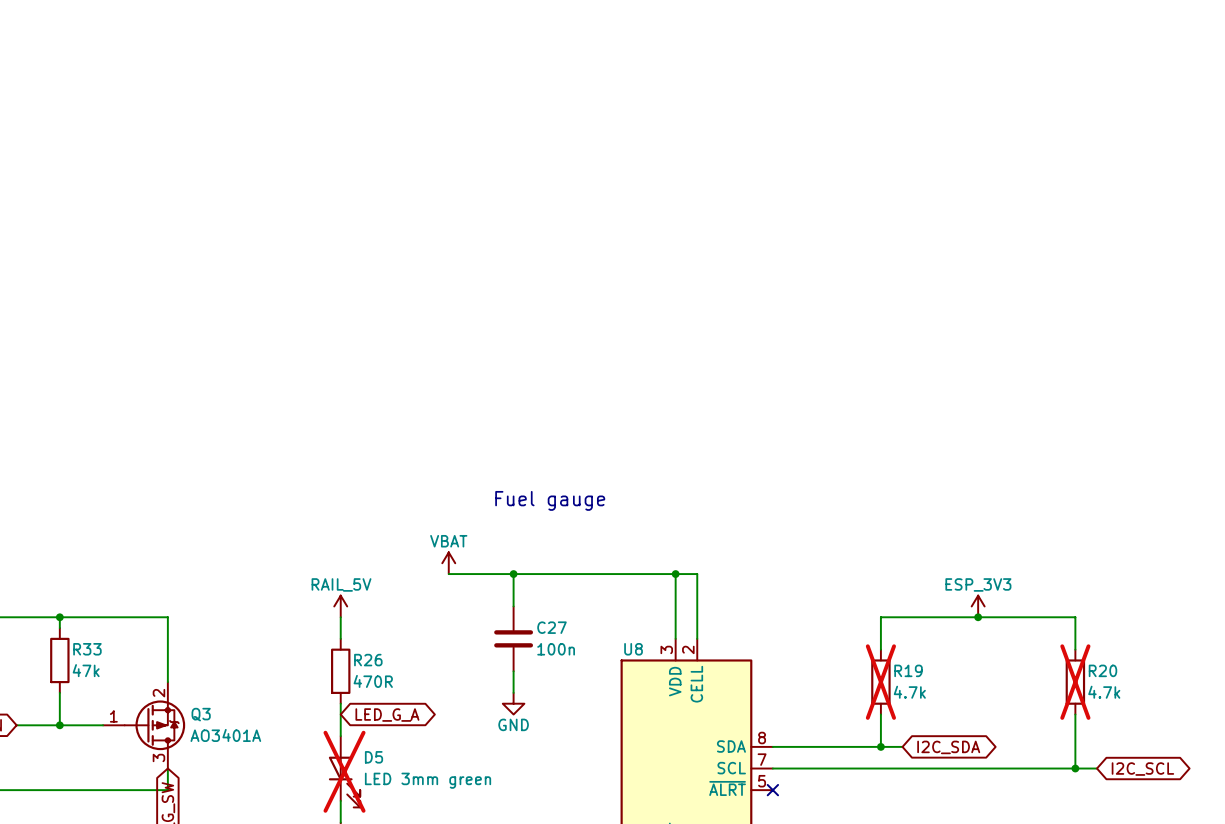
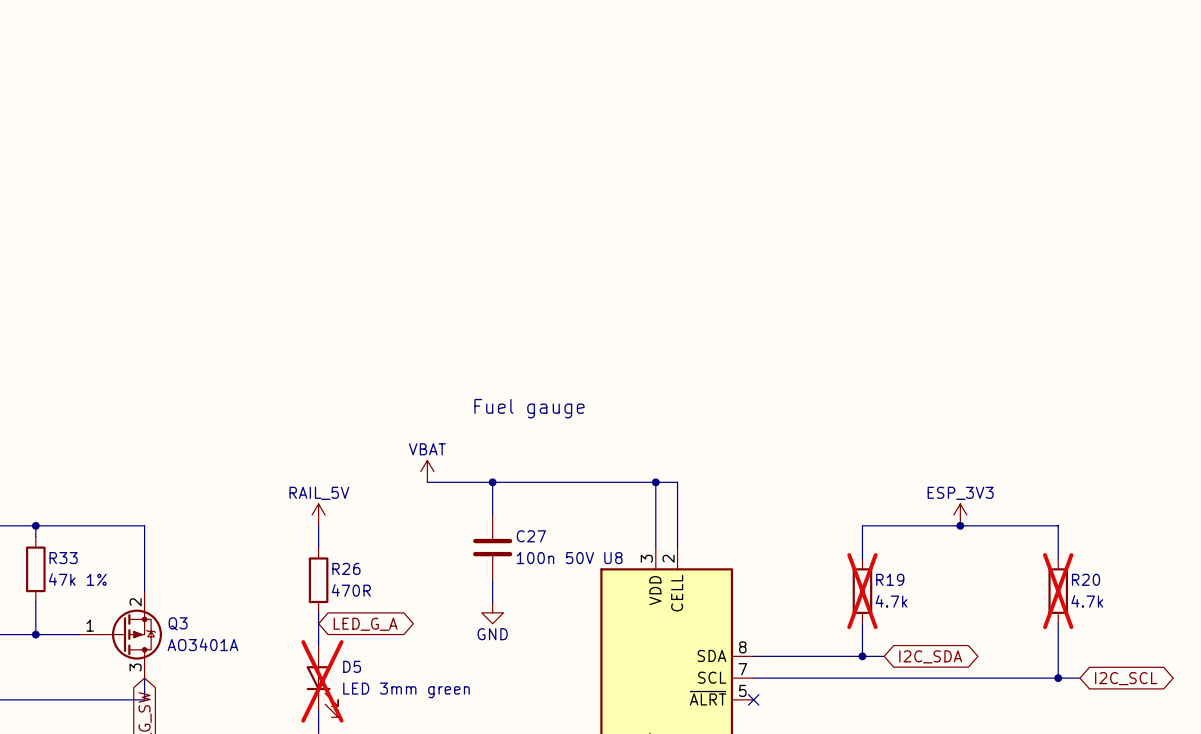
C27 value: 100n (556, 649) -> 100n 50V (555, 558)
R33 value: 47k (86, 670) -> 47k 1% (77, 579)

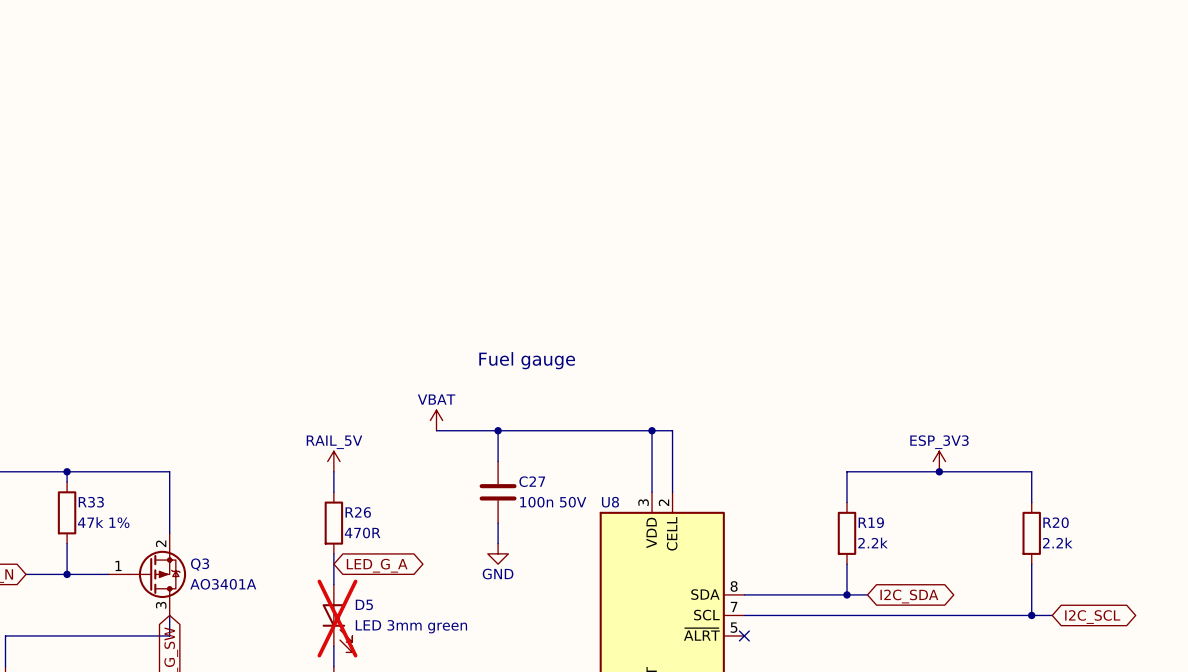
R19 do-not-place cross: (862, 591) -> none
R20 do-not-place cross: (1058, 591) -> none
R19 value: 4.7k (891, 601) -> 2.2k (873, 543)
R20 value: 4.7k (1087, 601) -> 2.2k (1057, 543)

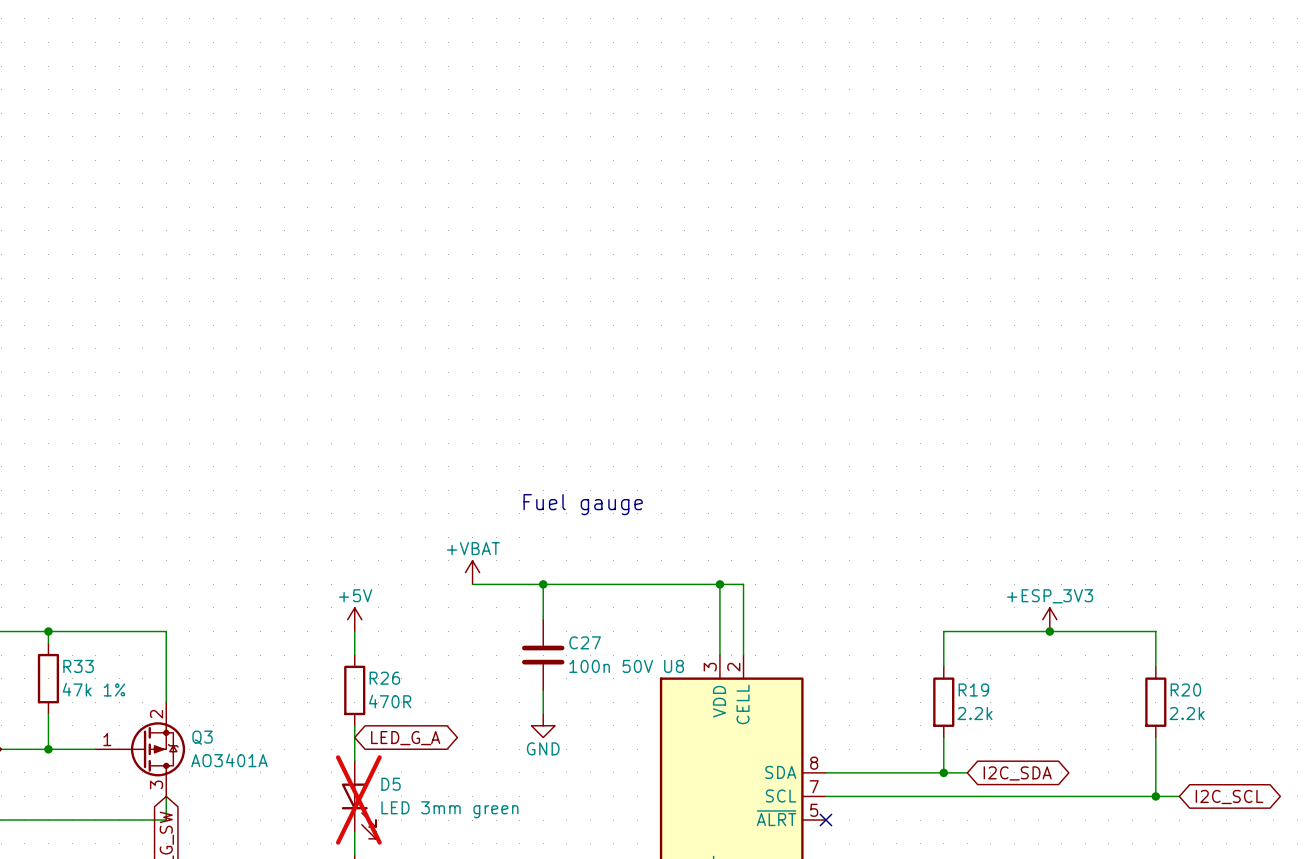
power symbol: VBAT (436, 420) -> +VBAT (472, 572)
power symbol: RAIL_5V (333, 461) -> +5V (354, 619)
power symbol: ESP_3V3 (939, 461) -> +ESP_3V3 (1049, 619)

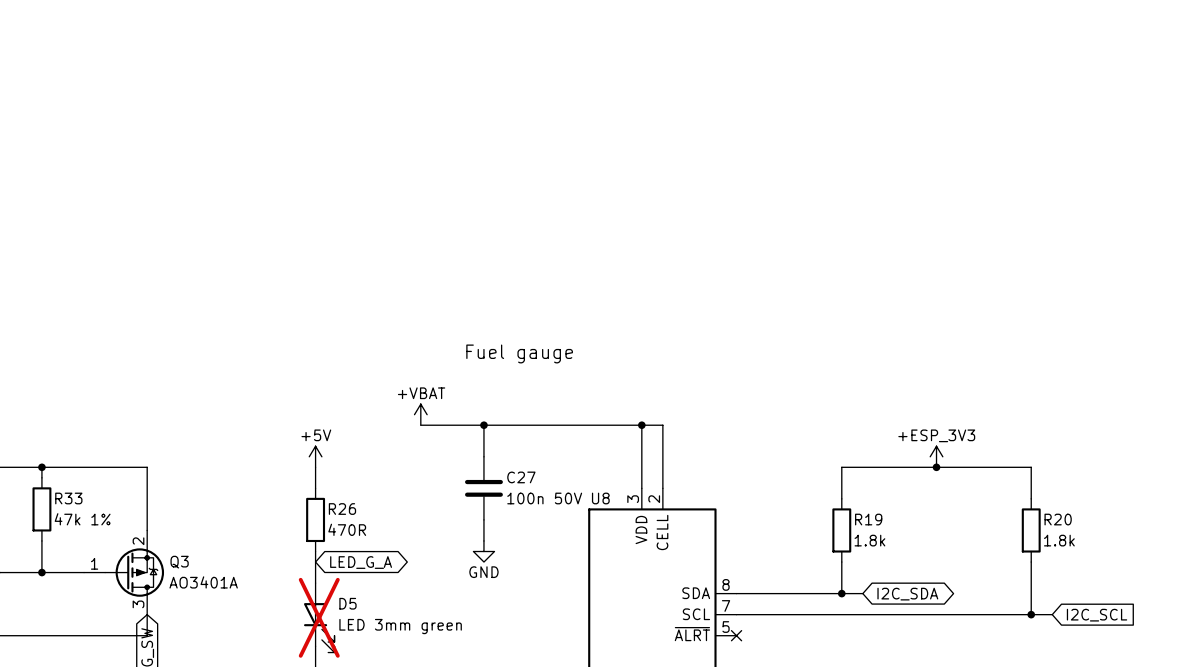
R19 value: 2.2k (975, 713) -> 1.8k (869, 540)
R20 value: 2.2k (1187, 713) -> 1.8k (1059, 540)
global label shape: bidirectional (1229, 797) -> input (1097, 615)

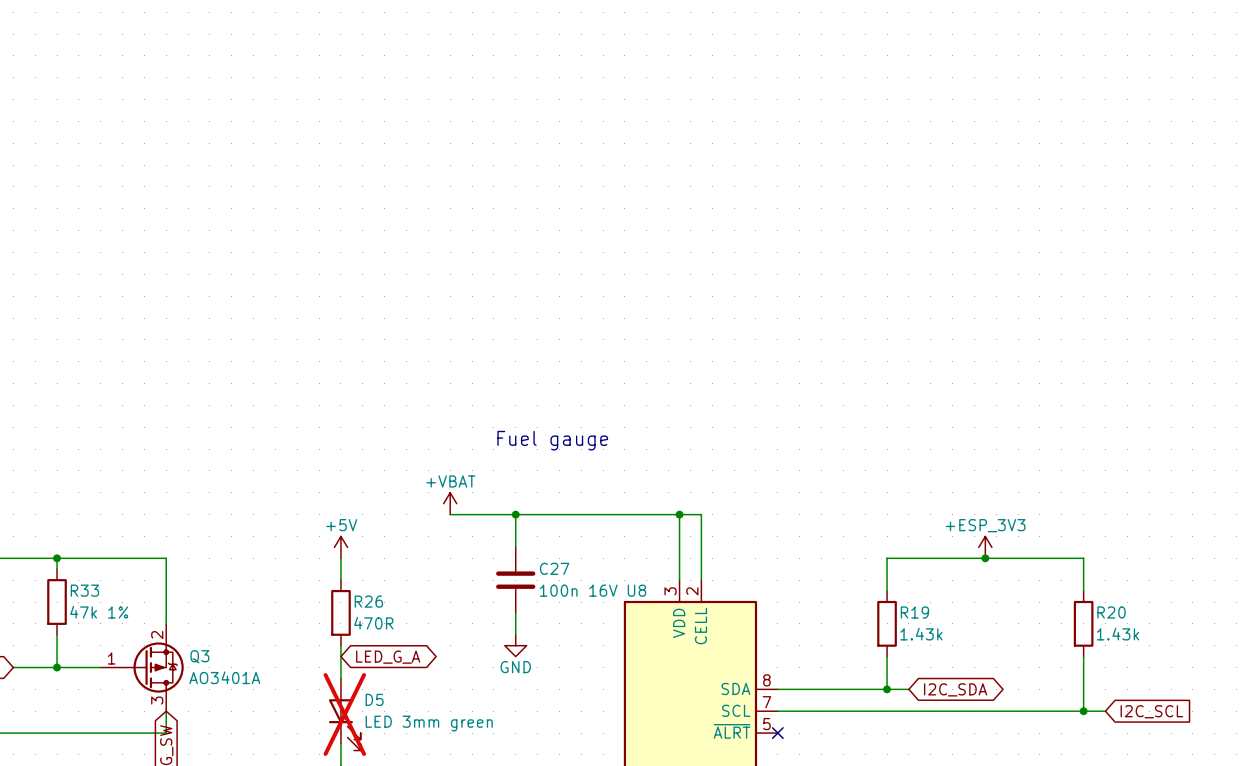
C27 value: 100n 50V (544, 498) -> 100n 16V (578, 590)
R19 value: 1.8k (869, 540) -> 1.43k (921, 634)
R20 value: 1.8k (1059, 540) -> 1.43k (1118, 634)

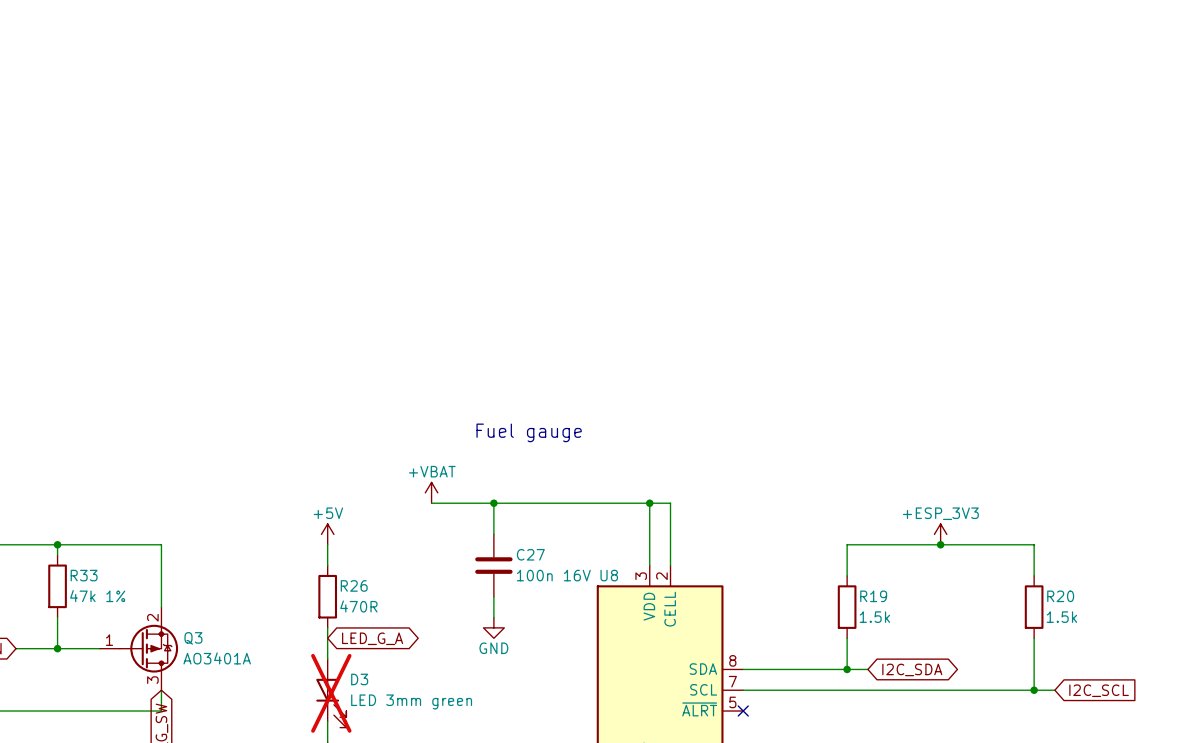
R19 value: 1.43k (921, 634) -> 1.5k (874, 617)
R20 value: 1.43k (1118, 634) -> 1.5k (1061, 617)
D5 name: D5 (374, 699) -> D3 (359, 679)

